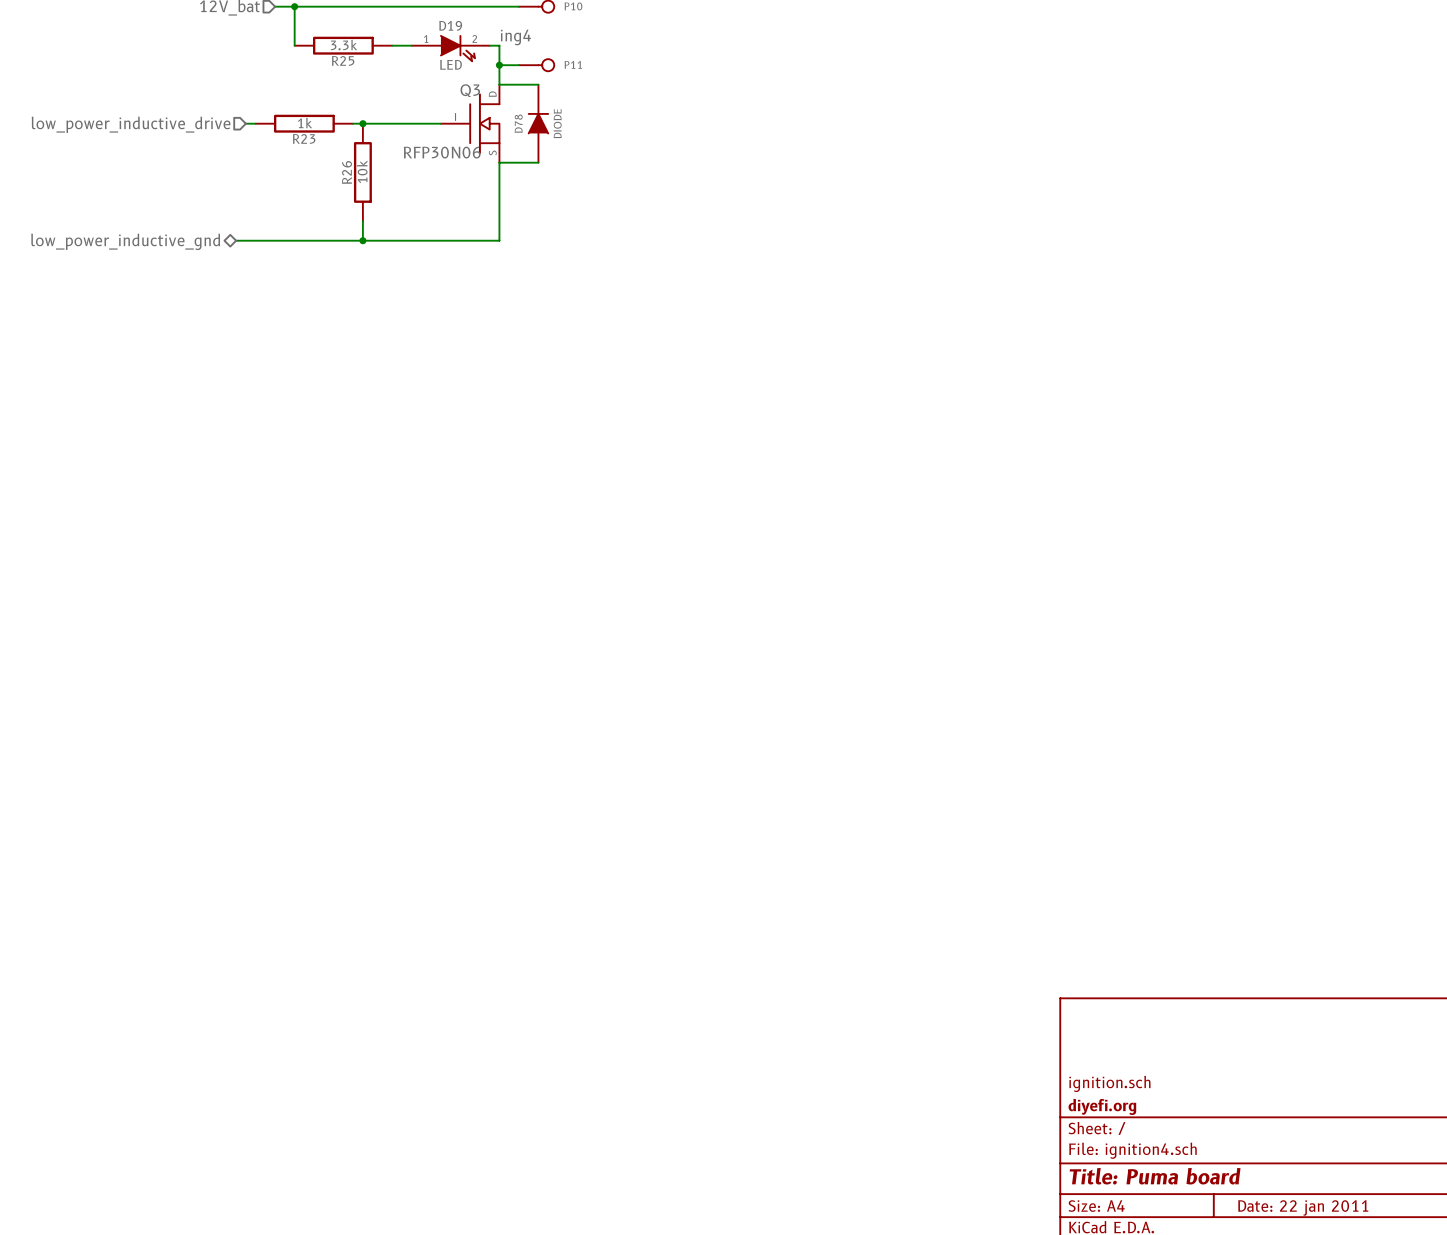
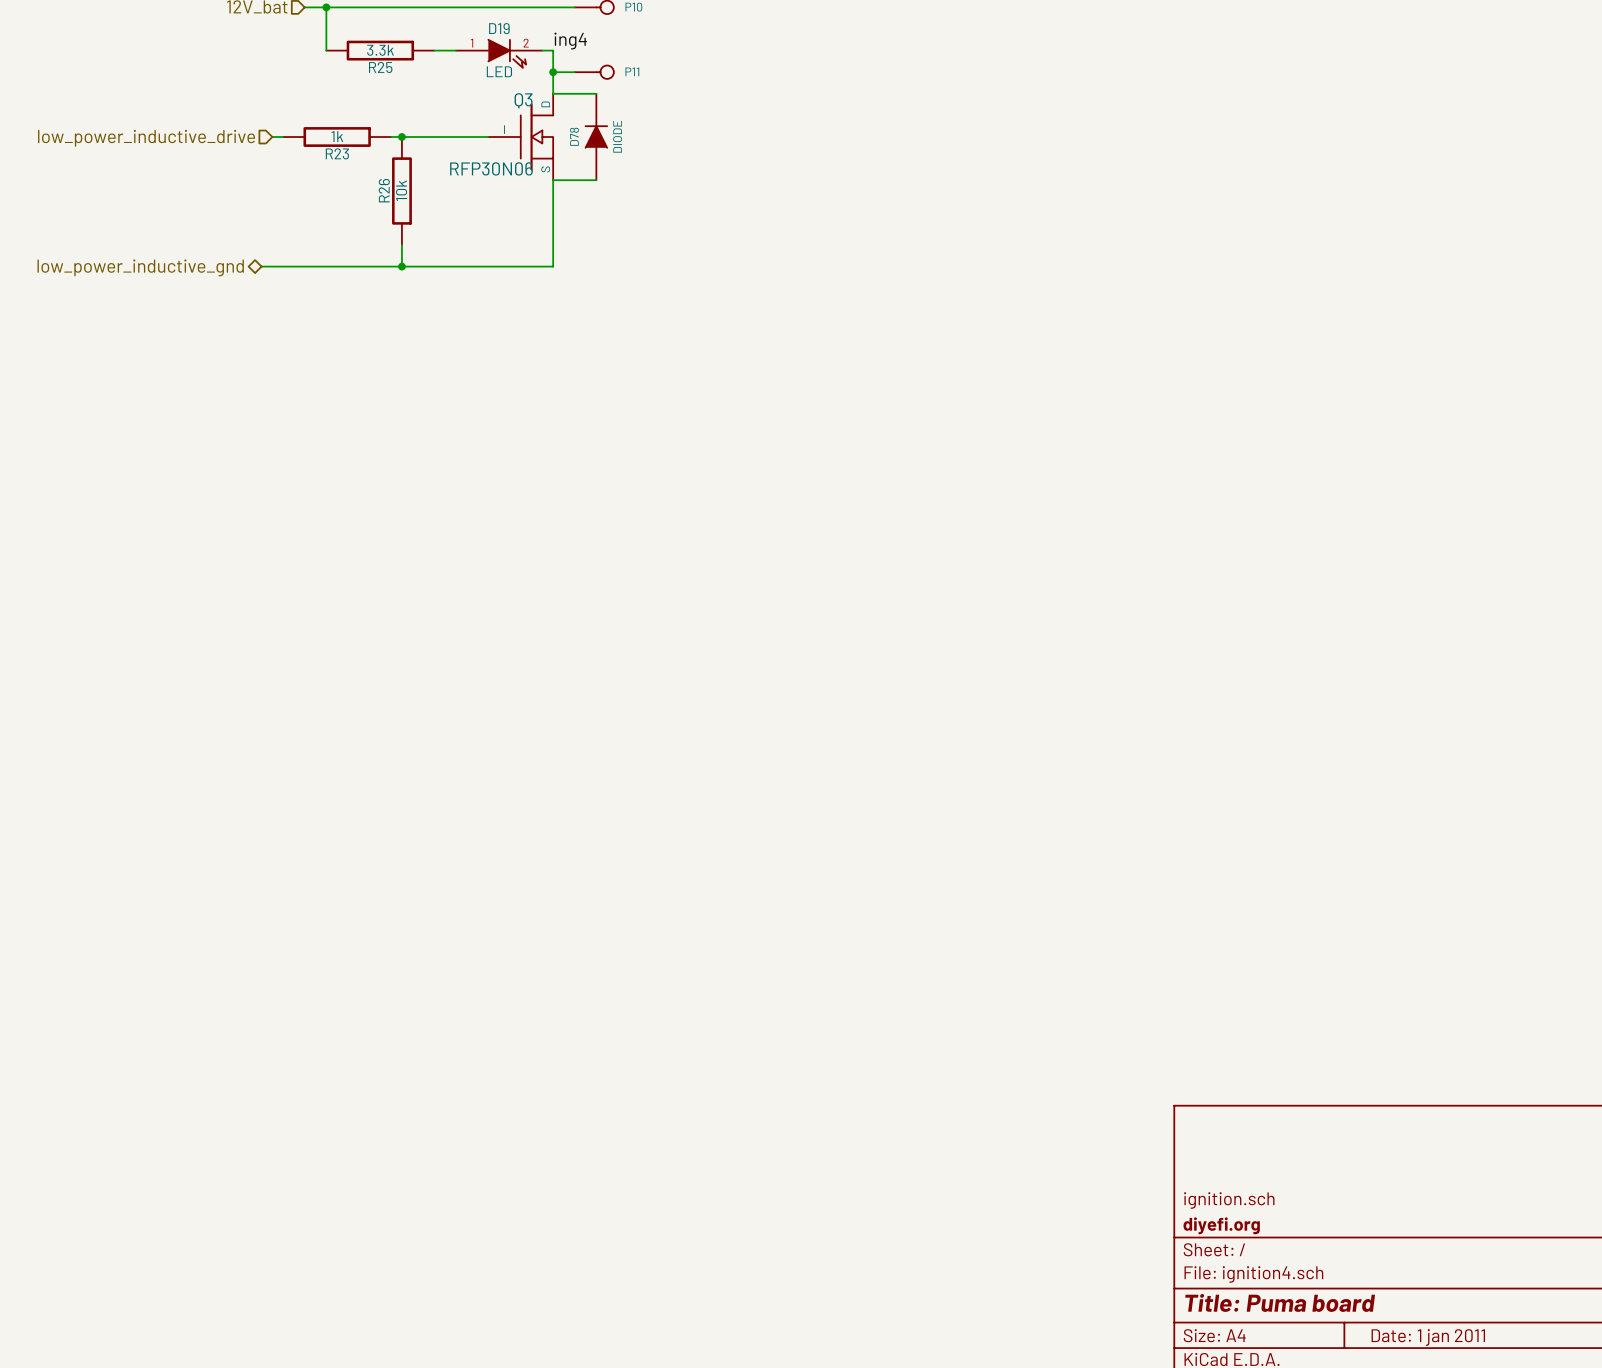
title block: Date: 22 jan 2011 (1303, 1207) -> Date: 1 jan 2011 (1428, 1337)

